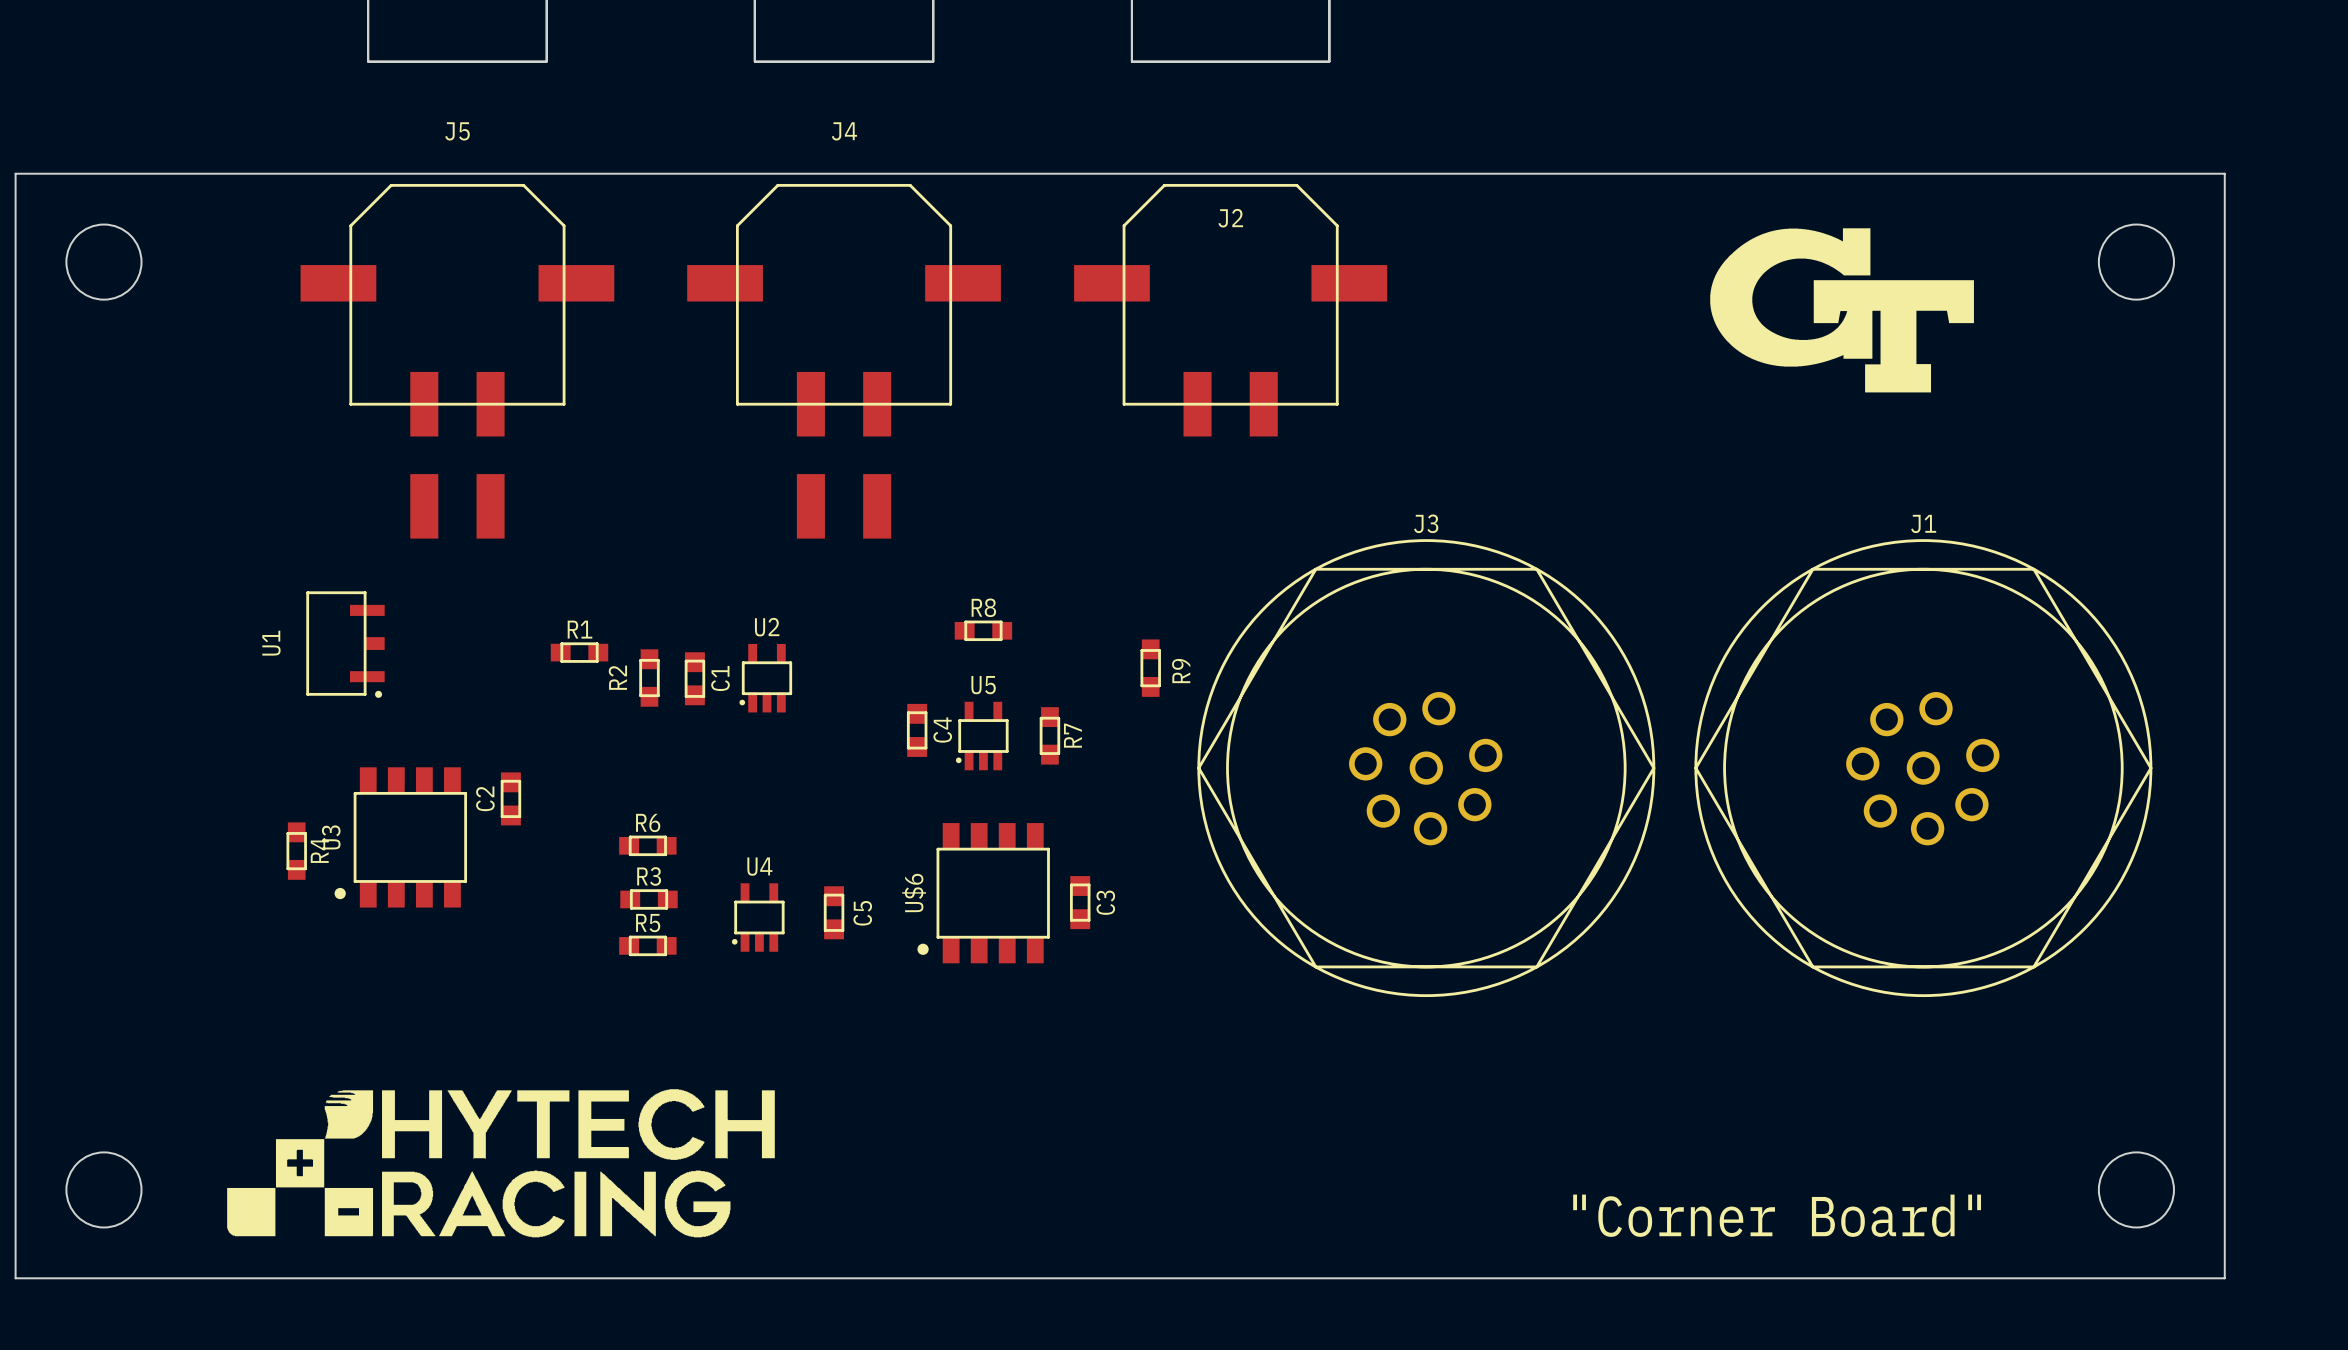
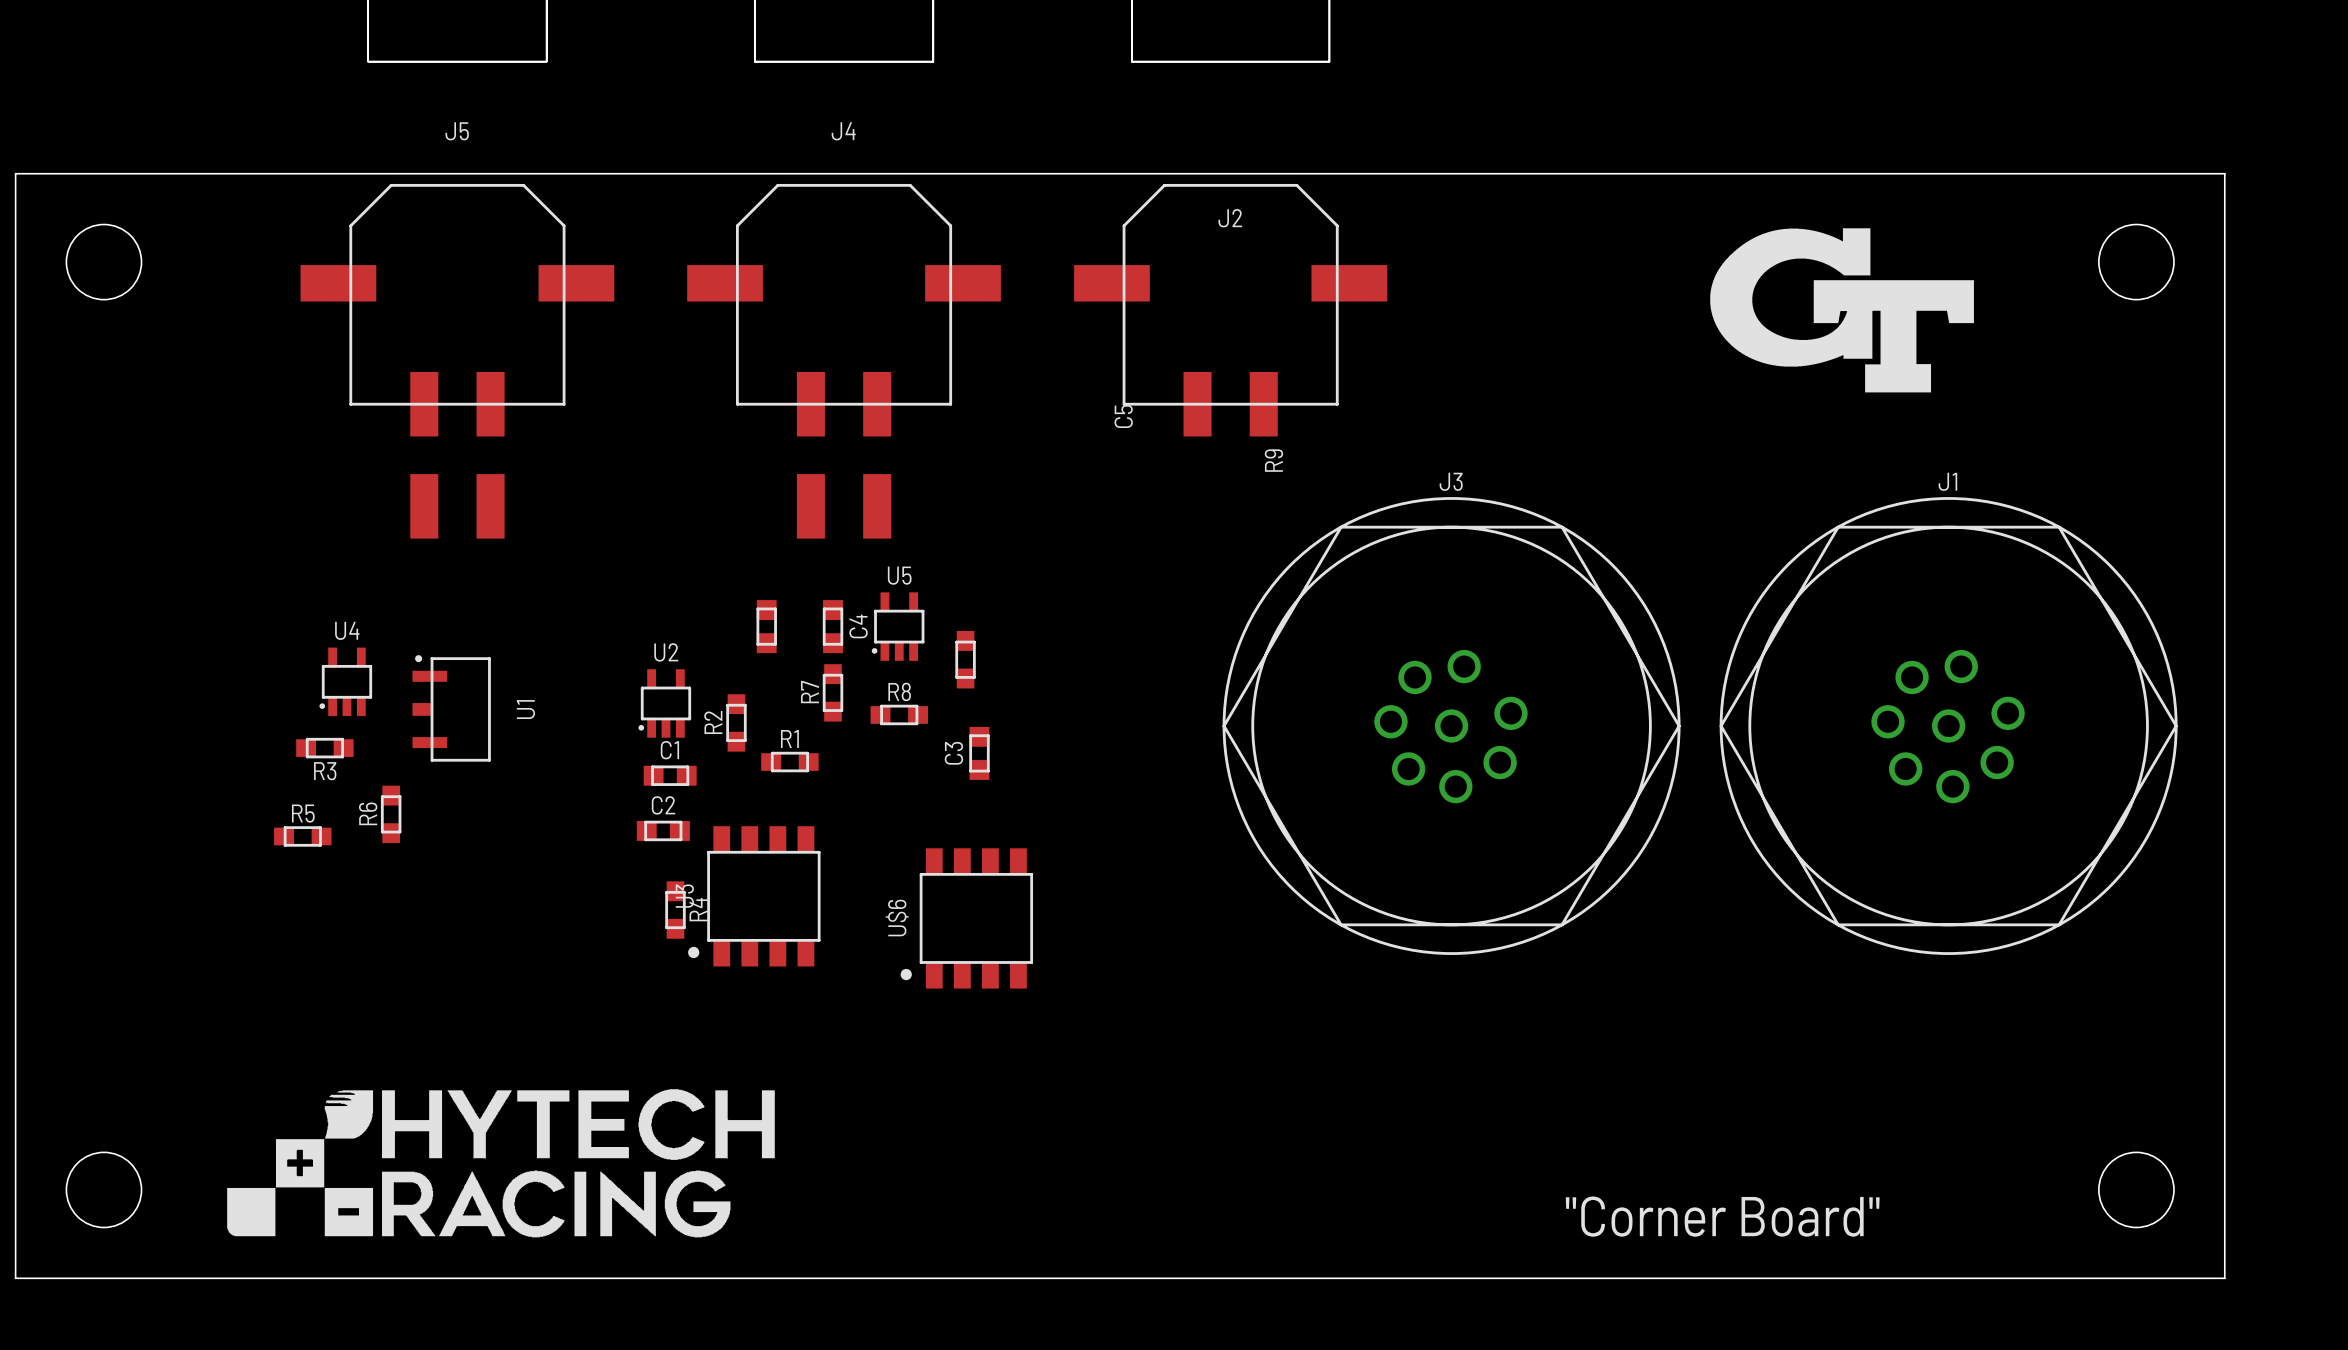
R8 position: (983, 630) -> (899, 714)
U1 rotation: 0° (345, 644) -> 180° (451, 708)
U1 position: (345, 644) -> (451, 708)
R1 position: (579, 652) -> (789, 762)
R9 position: (1150, 668) -> (965, 659)
R9 name position: R9 (1181, 671) -> R9 (1273, 460)
R2 name position: R2 (617, 677) -> R2 (713, 722)
R2 position: (649, 678) -> (736, 722)
C1 rotation: 0° (694, 678) -> 90° clockwise (670, 775)
C1 position: (694, 678) -> (670, 775)
U2 position: (765, 678) -> (664, 703)
C4 position: (917, 730) -> (833, 626)
R7 position: (1049, 735) -> (833, 692)
R7 name position: R7 (1072, 735) -> R7 (809, 692)
U5 position: (982, 736) -> (898, 626)
J3 position: (1426, 768) -> (1451, 726)
J1 position: (1923, 768) -> (1948, 726)
C2 rotation: 0° (510, 798) -> 90° clockwise (663, 830)
C2 position: (510, 798) -> (663, 830)
U3 position: (400, 837) -> (754, 896)
R6 rotation: 0° (647, 845) -> 90° clockwise (391, 814)
R6 position: (647, 845) -> (391, 814)
R4 position: (296, 851) -> (675, 910)
R3 name position: R3 (649, 876) -> R3 (325, 771)
U$6 position: (983, 893) -> (966, 918)
R3 position: (649, 899) -> (324, 748)
C3 position: (1080, 902) -> (979, 753)
C3 name position: C3 (1105, 902) -> C3 (953, 753)
C5 position: (834, 912) -> (766, 626)
C5 name position: C5 (862, 913) -> C5 (1123, 416)
U4 position: (758, 917) -> (345, 681)
R5 position: (647, 945) -> (302, 836)

